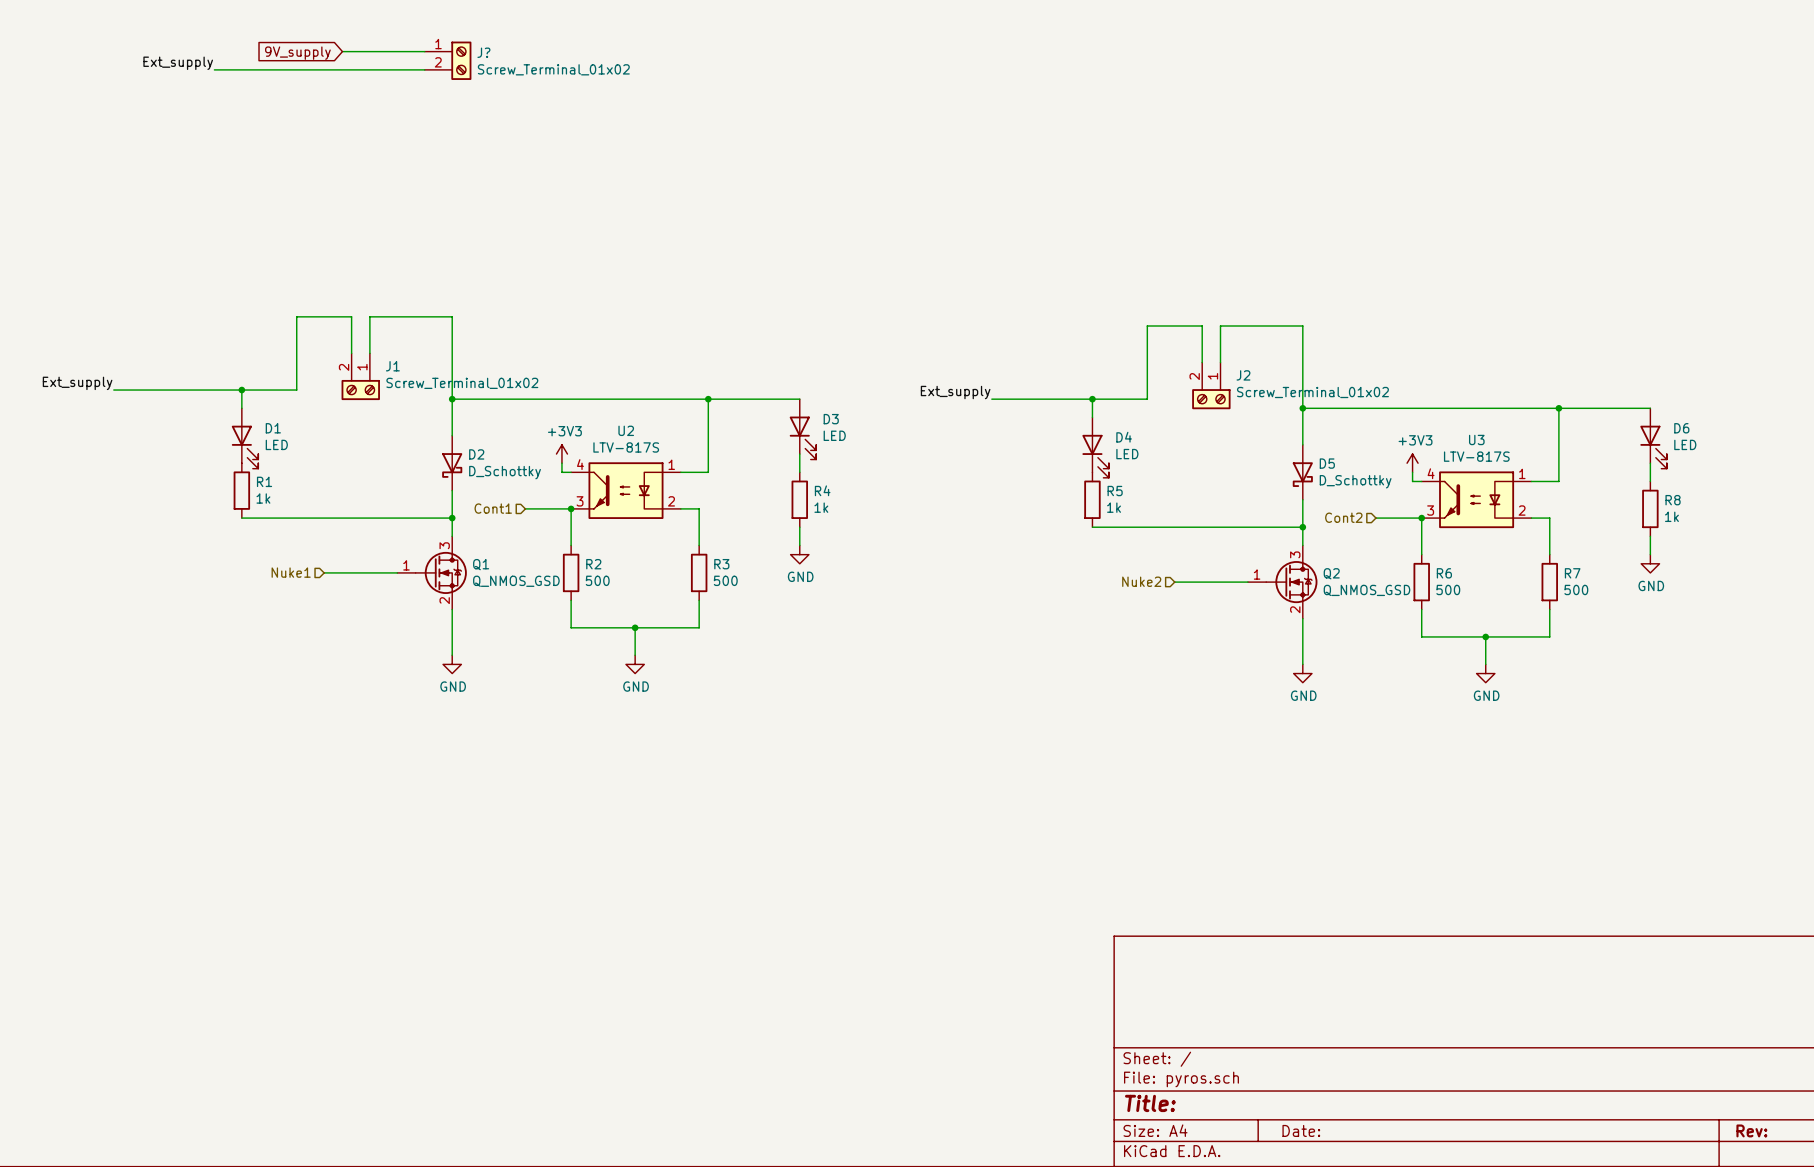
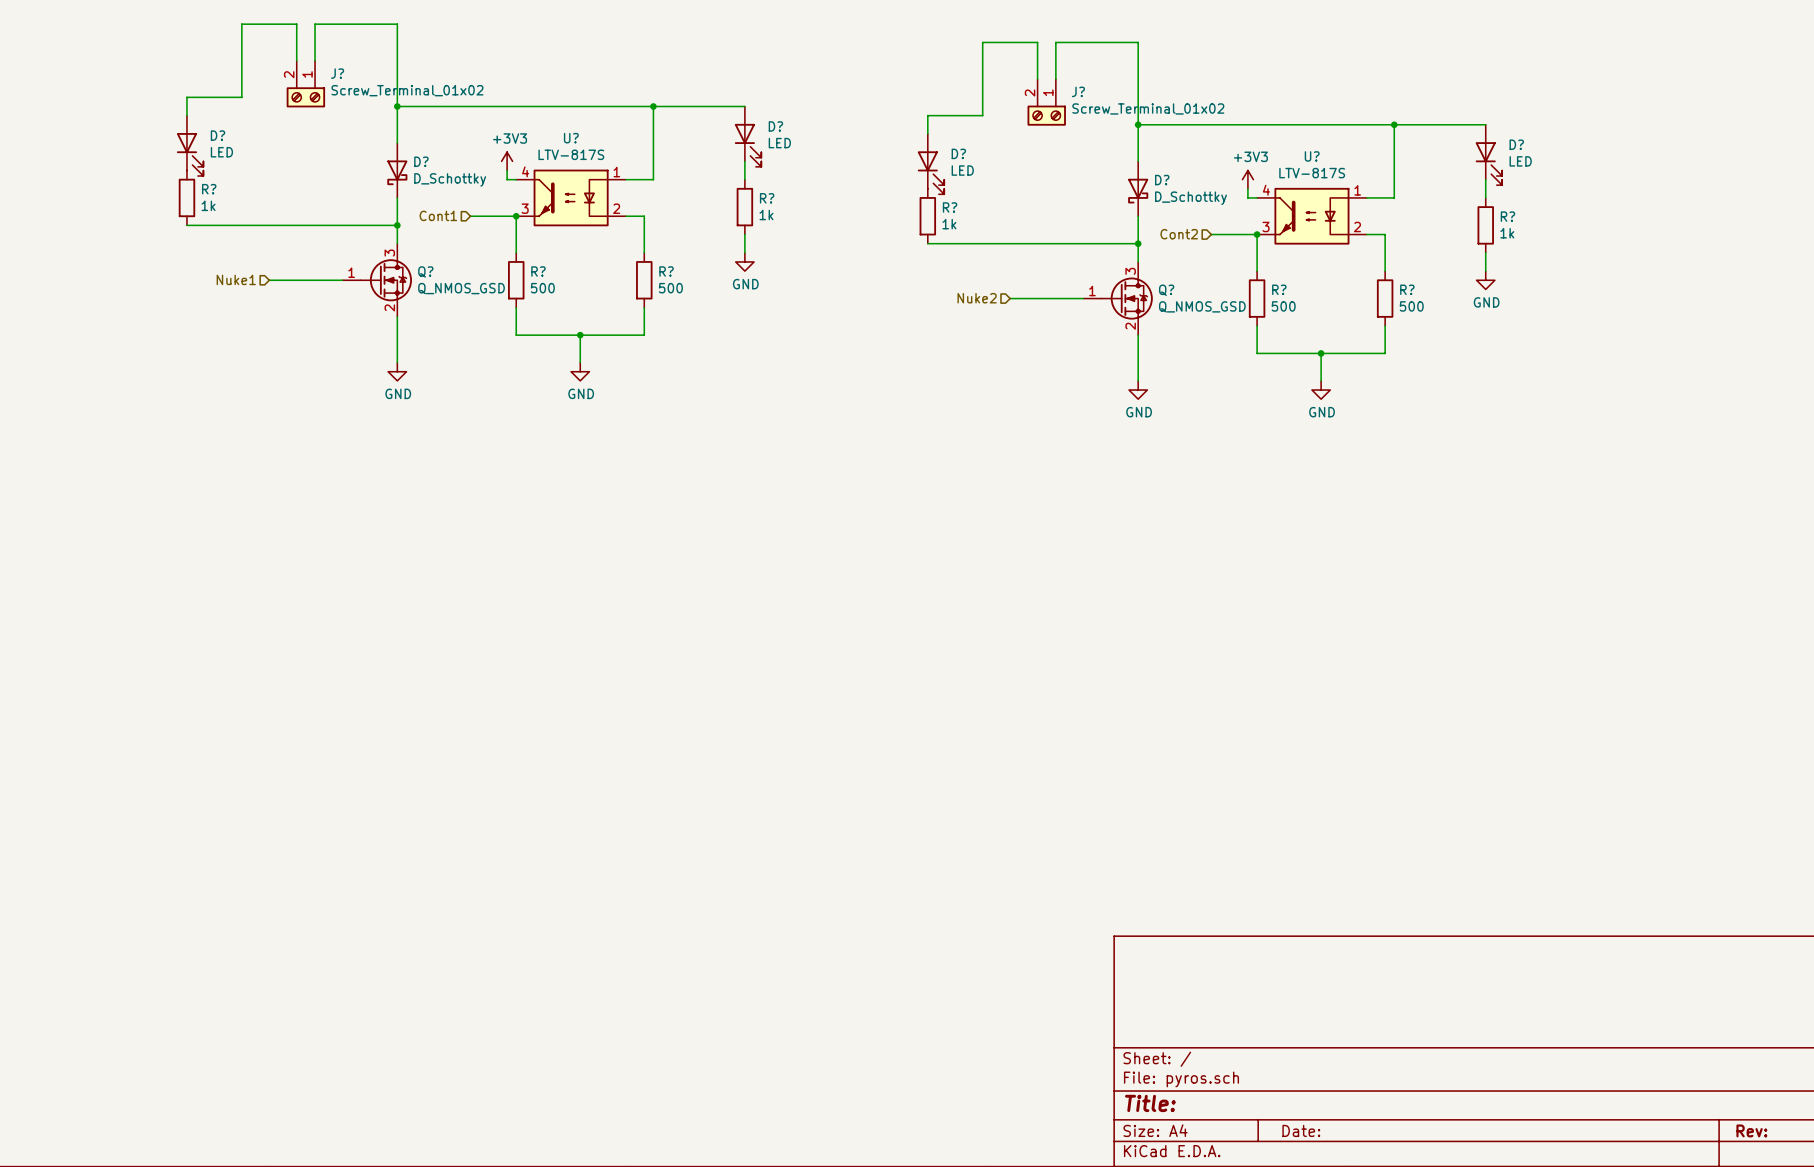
wire: (342, 51) (424, 51) -> none
global label: 9V_supply (297, 53) -> none
wire: none -> (296, 60) (296, 24) (241, 24) (241, 97) (186, 97) (186, 115)
wire: none -> (315, 60) (315, 24) (397, 24) (397, 143)
J? position: (448, 60) -> (305, 84)
J? rotation: 0° (461, 60) -> 90° clockwise (305, 97)
label: Ext_supply (178, 63) -> none
wire: (214, 69) (424, 69) -> (186, 225) (397, 225)
wire: none -> (1037, 79) (1037, 42) (982, 42) (982, 115) (927, 115) (927, 133)
wire: none -> (1055, 79) (1055, 42) (1138, 42) (1138, 161)
J?: none -> Screw_Terminal_01x02 (1046, 102)
wire: none -> (397, 106) (744, 106)
junction: none -> (397, 106)
wire: none -> (653, 106) (653, 179) (625, 179)
junction: none -> (653, 106)
wire: none -> (1138, 124) (1485, 124)
junction: none -> (1138, 124)
wire: none -> (1394, 124) (1394, 197) (1366, 197)
junction: none -> (1394, 124)
D?: none -> LED (748, 136)
D?: none -> LED (190, 145)
D?: none -> LED (1488, 154)
power symbol: none -> +3V3 (507, 161)
wire: none -> (744, 161) (744, 179)
D?: none -> LED (931, 164)
D?: none -> D_Schottky (397, 170)
wire: none -> (507, 170) (507, 179) (516, 179)
power symbol: none -> +3V3 (1247, 179)
wire: none -> (1485, 179) (1485, 197)
D?: none -> D_Schottky (1138, 188)
wire: none -> (1247, 188) (1247, 197) (1257, 197)
R?: none -> 1k (186, 197)
wire: none -> (397, 197) (397, 243)
U?: none -> LTV-817S (571, 197)
R?: none -> 1k (744, 207)
hierarchical label: none -> Cont1 (438, 215)
wire: none -> (470, 216) (516, 216) (516, 252)
junction: none -> (516, 216)
wire: none -> (625, 216) (644, 216) (644, 252)
R?: none -> 1k (927, 216)
wire: none -> (1138, 216) (1138, 261)
U?: none -> LTV-817S (1311, 216)
junction: none -> (397, 225)
R?: none -> 1k (1485, 225)
wire: none -> (744, 234) (744, 252)
hierarchical label: none -> Cont2 (1179, 234)
wire: none -> (1211, 234) (1257, 234) (1257, 271)
junction: none -> (1257, 234)
wire: none -> (1366, 234) (1385, 234) (1385, 271)
wire: none -> (927, 243) (1138, 243)
junction: none -> (1138, 243)
wire: none -> (1485, 252) (1485, 271)
power symbol: none -> GND (744, 261)
hierarchical label: none -> Nuke1 (236, 279)
wire: none -> (269, 280) (342, 280)
Q?: none -> Q_NMOS_GSD (377, 280)
R?: none -> 500 (516, 280)
R?: none -> 500 (644, 280)
power symbol: none -> GND (1485, 280)
hierarchical label: none -> Nuke2 (977, 298)
wire: none -> (1010, 298) (1083, 298)
Q?: none -> Q_NMOS_GSD (1118, 298)
R?: none -> 500 (1257, 298)
R?: none -> 500 (1385, 298)
wire: none -> (516, 307) (516, 335) (644, 335) (644, 307)
wire: none -> (397, 316) (397, 362)
wire: none -> (1257, 325) (1257, 353) (1385, 353) (1385, 325)
wire: none -> (580, 335) (580, 362)
junction: none -> (580, 335)
wire: none -> (1138, 335) (1138, 380)
wire: (351, 353) (351, 316) (296, 316) (296, 390) (113, 390) -> none
wire: (369, 353) (369, 316) (452, 316) (452, 435) -> none
wire: none -> (1321, 353) (1321, 380)
junction: none -> (1321, 353)
wire: (1202, 362) (1202, 325) (1147, 325) (1147, 399) (991, 399) -> none
wire: (1220, 362) (1220, 325) (1302, 325) (1302, 444) -> none
power symbol: none -> GND (397, 371)
power symbol: none -> GND (580, 371)
J1: Screw_Terminal_01x02 (360, 376) -> none
label: Ext_supply (77, 383) -> none
J2: Screw_Terminal_01x02 (1211, 385) -> none
wire: (241, 390) (241, 408) -> none
junction: (241, 390) -> none
power symbol: none -> GND (1138, 390)
power symbol: none -> GND (1321, 390)
label: Ext_supply (955, 392) -> none
wire: (452, 399) (799, 399) -> none
junction: (452, 399) -> none
wire: (708, 399) (708, 472) (680, 472) -> none
junction: (708, 399) -> none
wire: (1092, 399) (1092, 417) -> none
junction: (1092, 399) -> none
wire: (1302, 408) (1650, 408) -> none
junction: (1302, 408) -> none
wire: (1558, 408) (1558, 481) (1531, 481) -> none
junction: (1558, 408) -> none
D3: LED (802, 429) -> none
D1: LED (245, 438) -> none
D6: LED (1653, 438) -> none
D4: LED (1095, 447) -> none
power symbol: +3V3 (561, 454) -> none
wire: (799, 454) (799, 472) -> none
D2: D_Schottky (452, 463) -> none
wire: (561, 463) (561, 472) (571, 472) -> none
power symbol: +3V3 (1412, 463) -> none
wire: (1650, 463) (1650, 481) -> none
D5: D_Schottky (1302, 472) -> none
wire: (1412, 472) (1412, 481) (1421, 481) -> none
R1: 1k (241, 490) -> none
wire: (452, 490) (452, 536) -> none
U2: LTV-817S (625, 490) -> none
R4: 1k (799, 499) -> none
R5: 1k (1092, 499) -> none
wire: (1302, 499) (1302, 545) -> none
U3: LTV-817S (1476, 499) -> none
hierarchical label: Cont1 (493, 508) -> none
wire: (525, 508) (571, 508) (571, 545) -> none
junction: (571, 508) -> none
wire: (680, 508) (699, 508) (699, 545) -> none
R8: 1k (1650, 508) -> none
hierarchical label: Cont2 (1343, 517) -> none
wire: (241, 518) (452, 518) -> none
junction: (452, 518) -> none
wire: (1375, 518) (1421, 518) (1421, 554) -> none
junction: (1421, 518) -> none
wire: (1531, 518) (1549, 518) (1549, 554) -> none
wire: (799, 527) (799, 545) -> none
wire: (1092, 527) (1302, 527) -> none
junction: (1302, 527) -> none
wire: (1650, 536) (1650, 554) -> none
power symbol: GND (799, 554) -> none
power symbol: GND (1650, 563) -> none
hierarchical label: Nuke1 (291, 572) -> none
wire: (324, 572) (397, 572) -> none
Q1: Q_NMOS_GSD (432, 572) -> none
R2: 500 (571, 572) -> none
R3: 500 (699, 572) -> none
hierarchical label: Nuke2 (1141, 581) -> none
wire: (1174, 582) (1247, 582) -> none
Q2: Q_NMOS_GSD (1282, 582) -> none
R6: 500 (1421, 582) -> none
R7: 500 (1549, 582) -> none
wire: (571, 600) (571, 627) (699, 627) (699, 600) -> none
wire: (452, 609) (452, 655) -> none
wire: (1421, 609) (1421, 636) (1549, 636) (1549, 609) -> none
wire: (1302, 618) (1302, 664) -> none
wire: (635, 627) (635, 655) -> none
junction: (635, 627) -> none
wire: (1485, 636) (1485, 664) -> none
junction: (1485, 636) -> none
power symbol: GND (452, 664) -> none
power symbol: GND (635, 664) -> none
power symbol: GND (1302, 673) -> none
power symbol: GND (1485, 673) -> none

